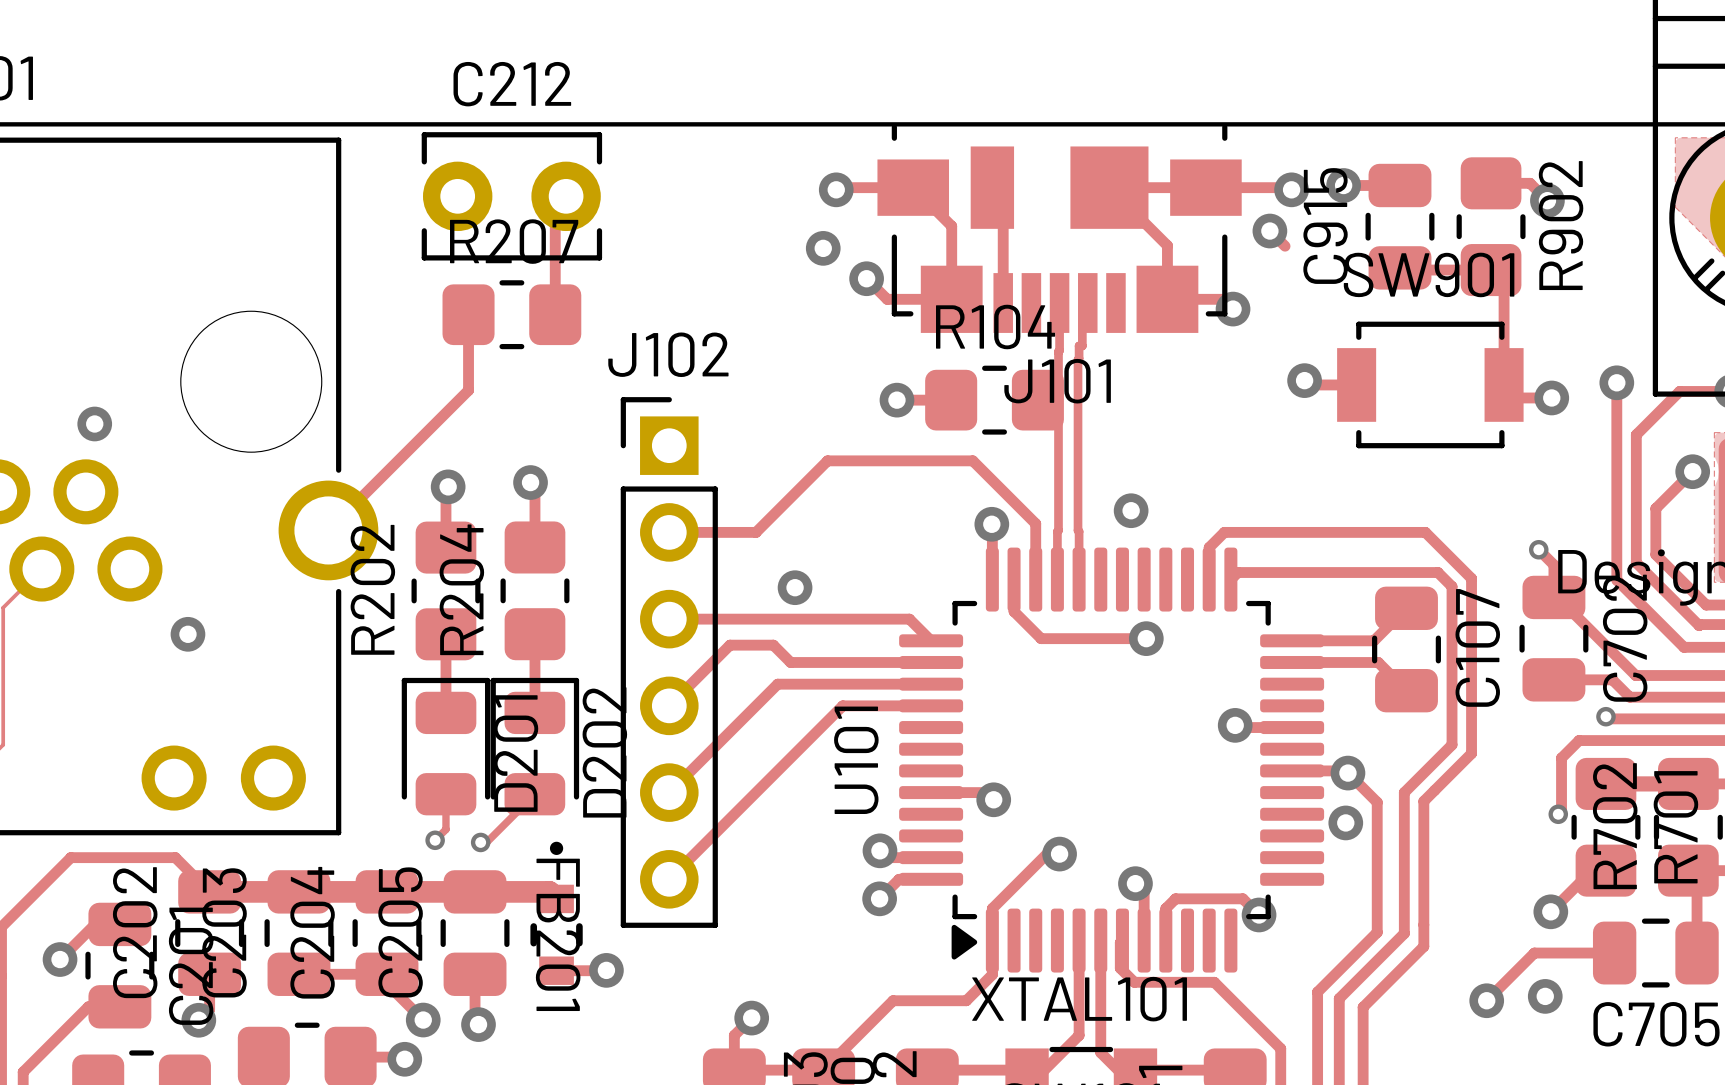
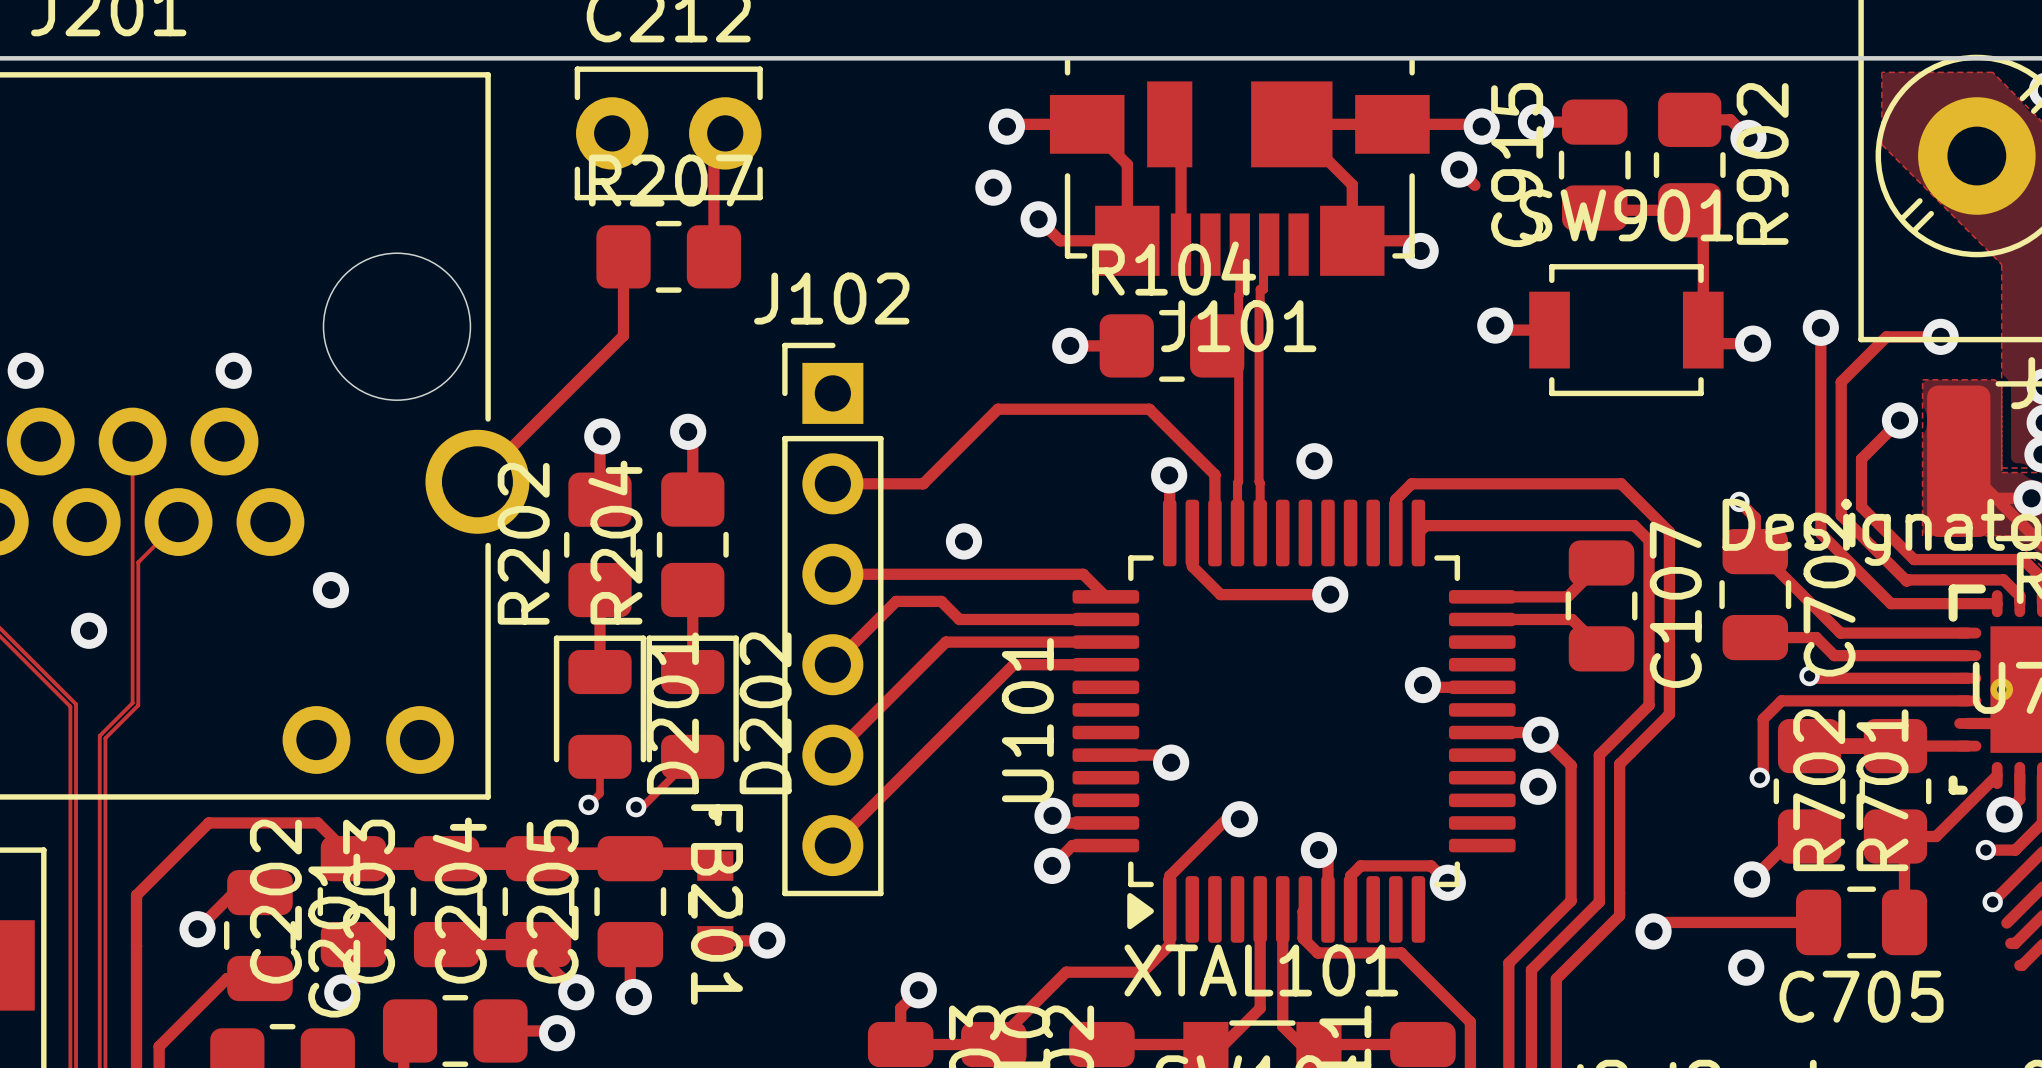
track: (1534, 953) (1486, 1000) -> (1734, 922) (1662, 922) (1653, 931)
via position: (1486, 1000) -> (1653, 931)

